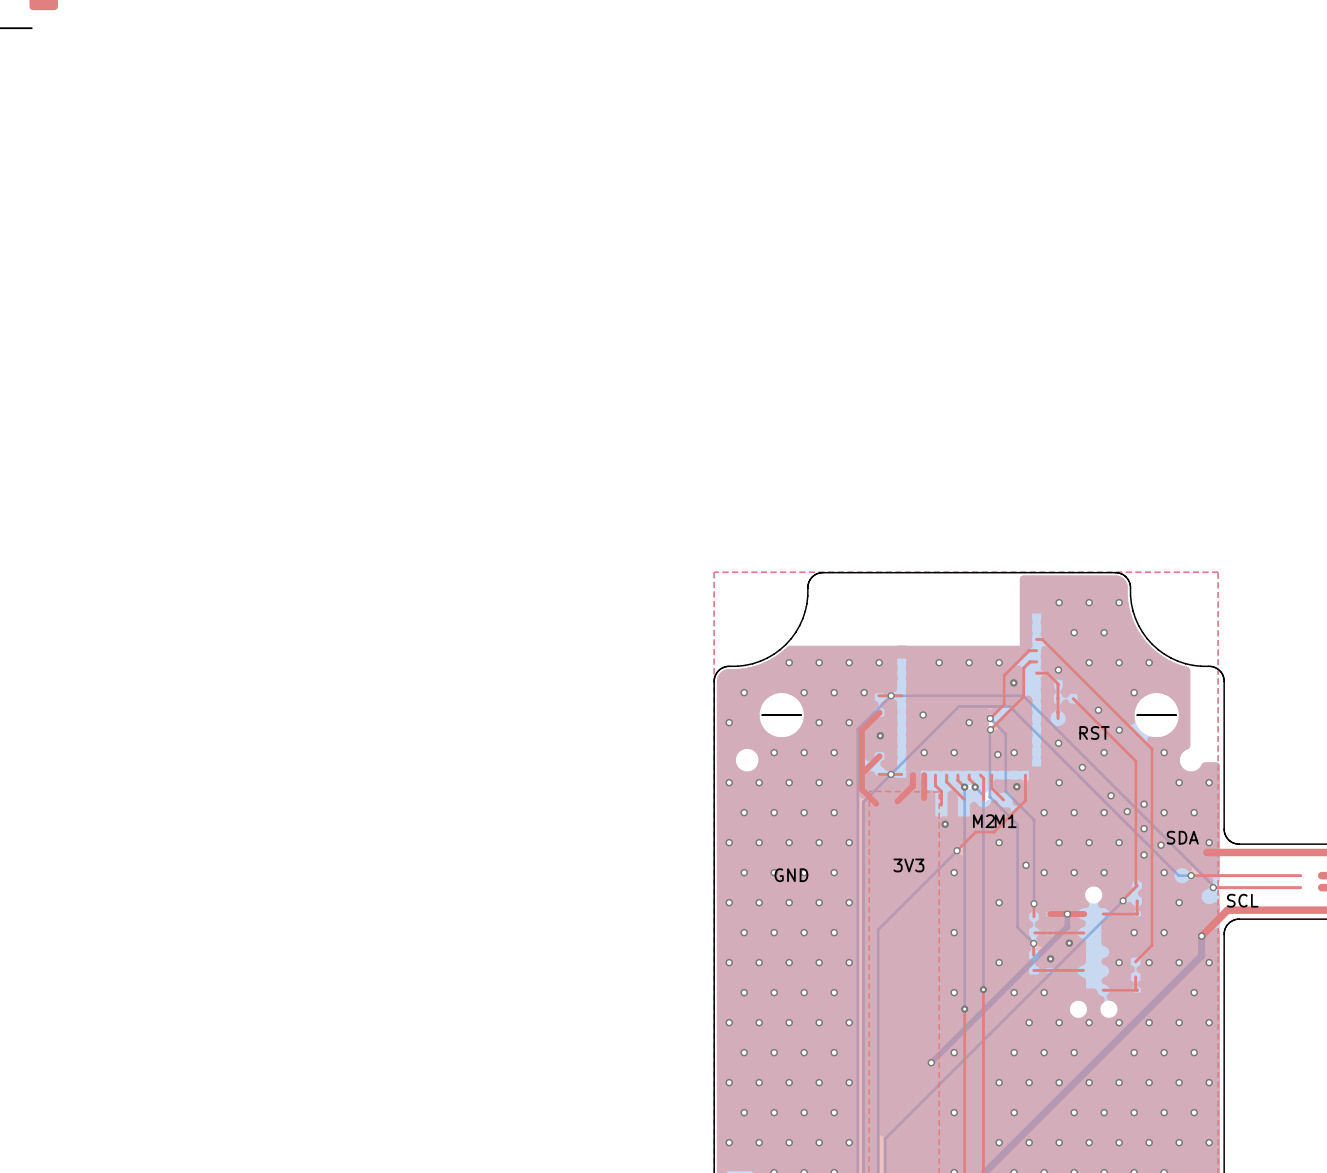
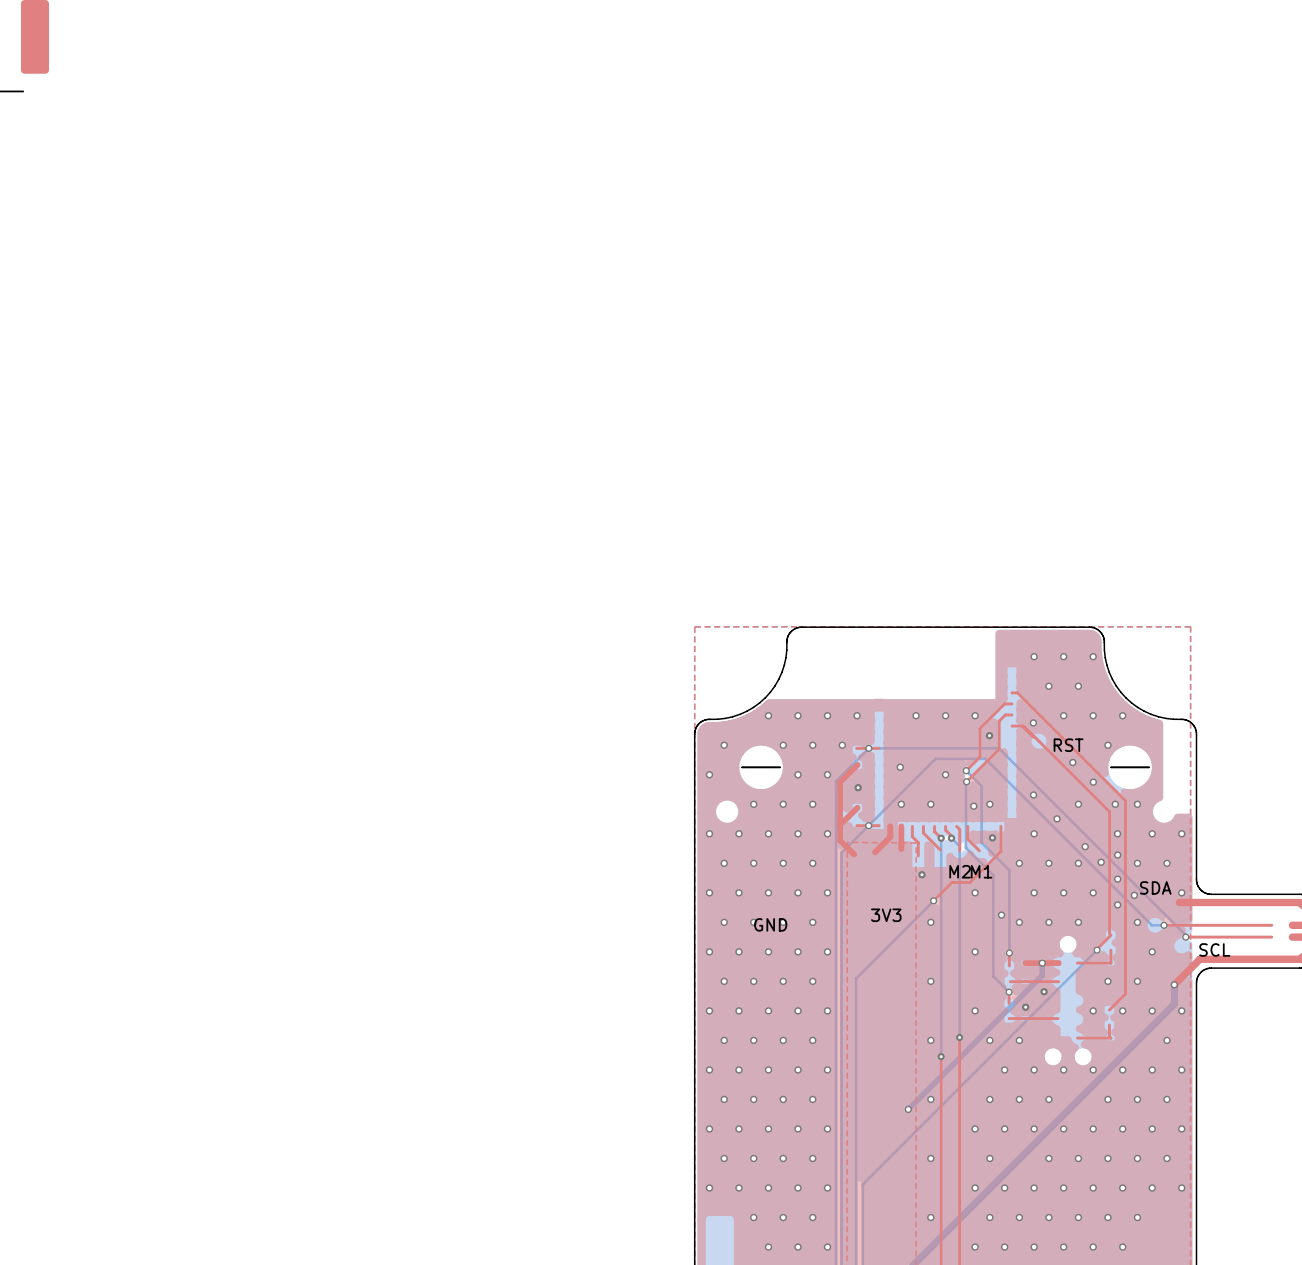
top track: (1073, 698) (1135, 761) -> (1022, 726) (1109, 812)
text position: RST (1094, 733) -> RST (1068, 745)
via: none -> (1115, 804)
via: none -> (1117, 833)

